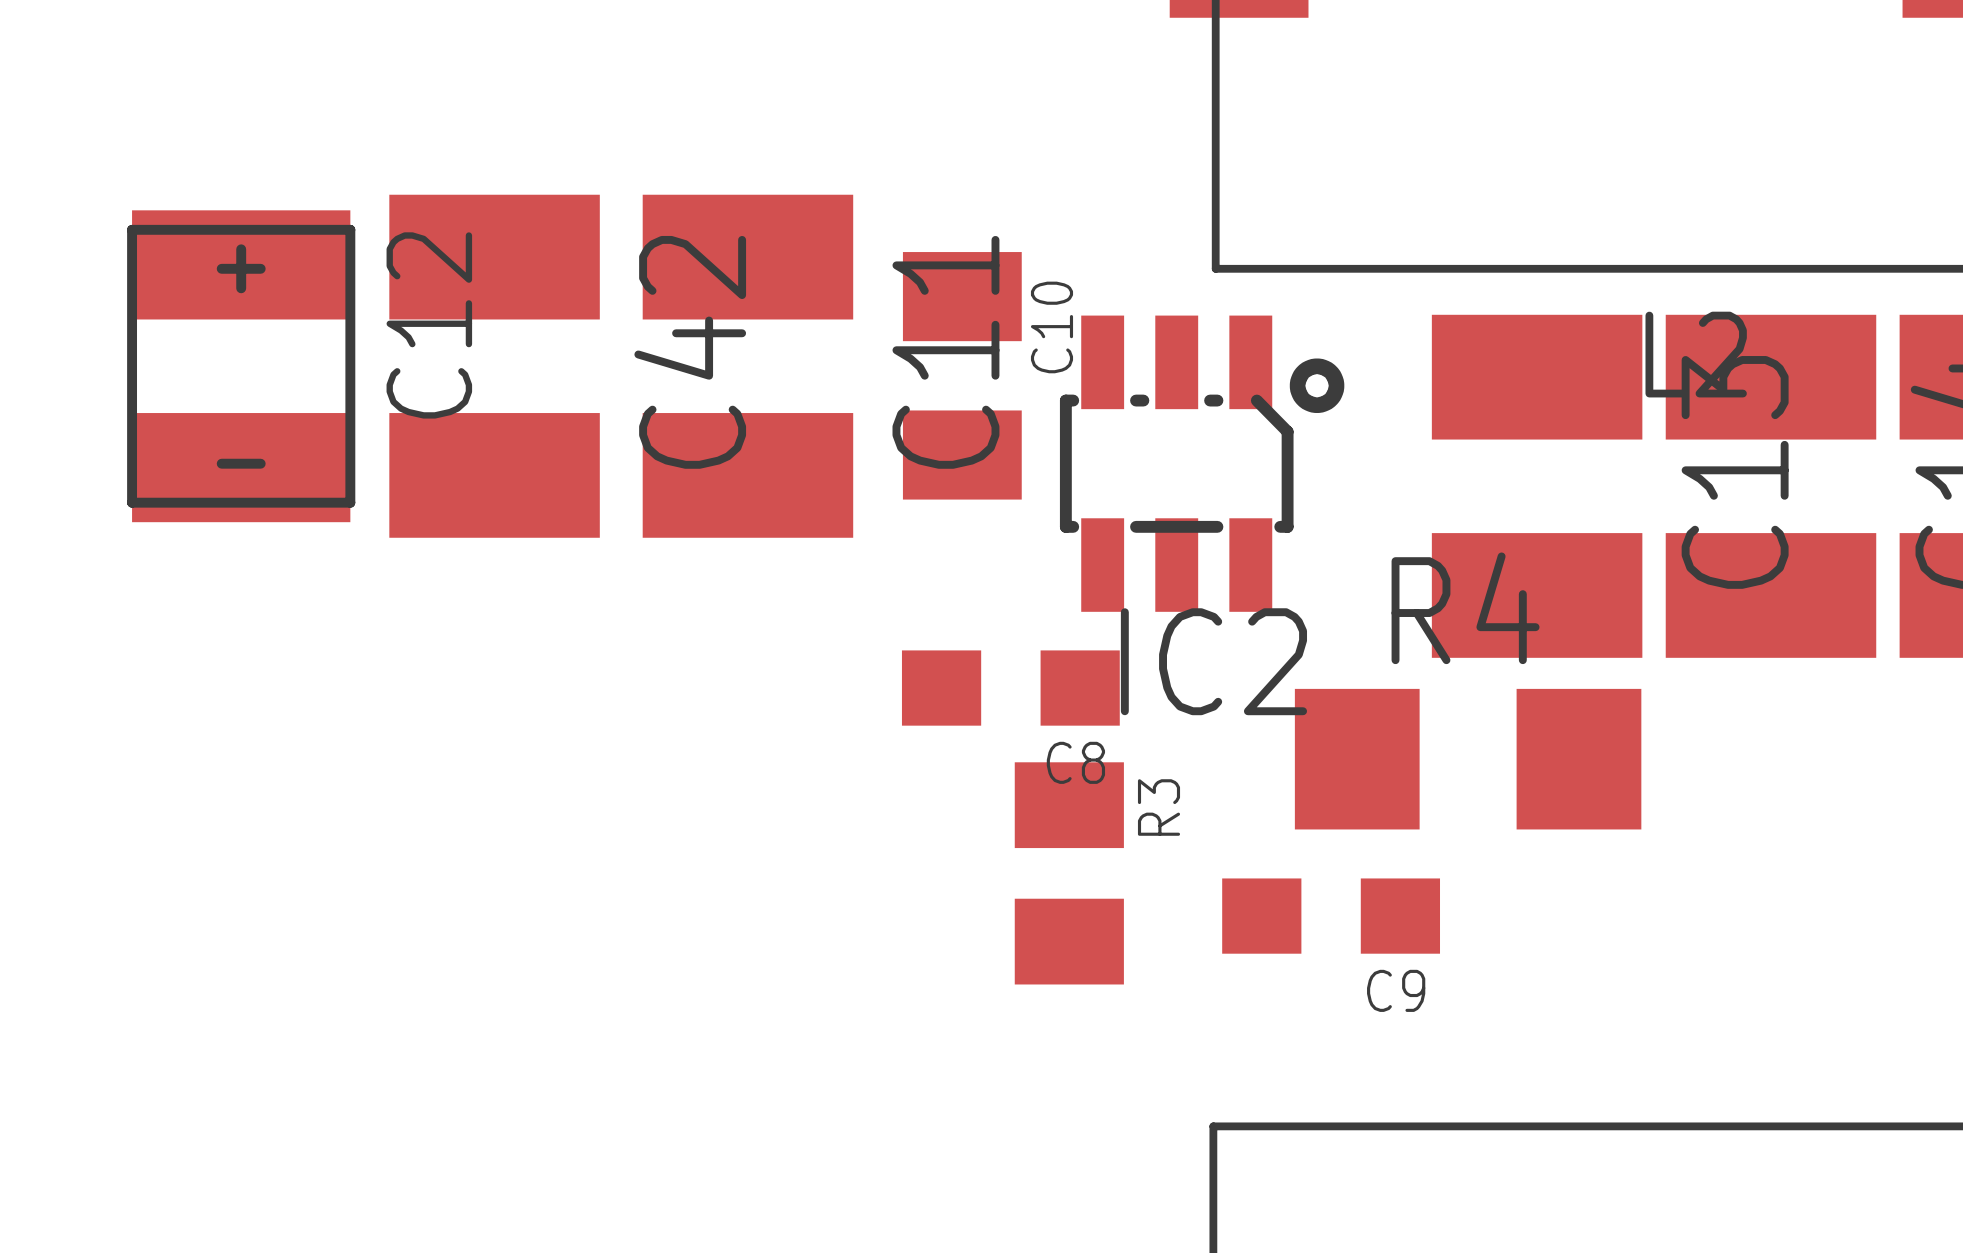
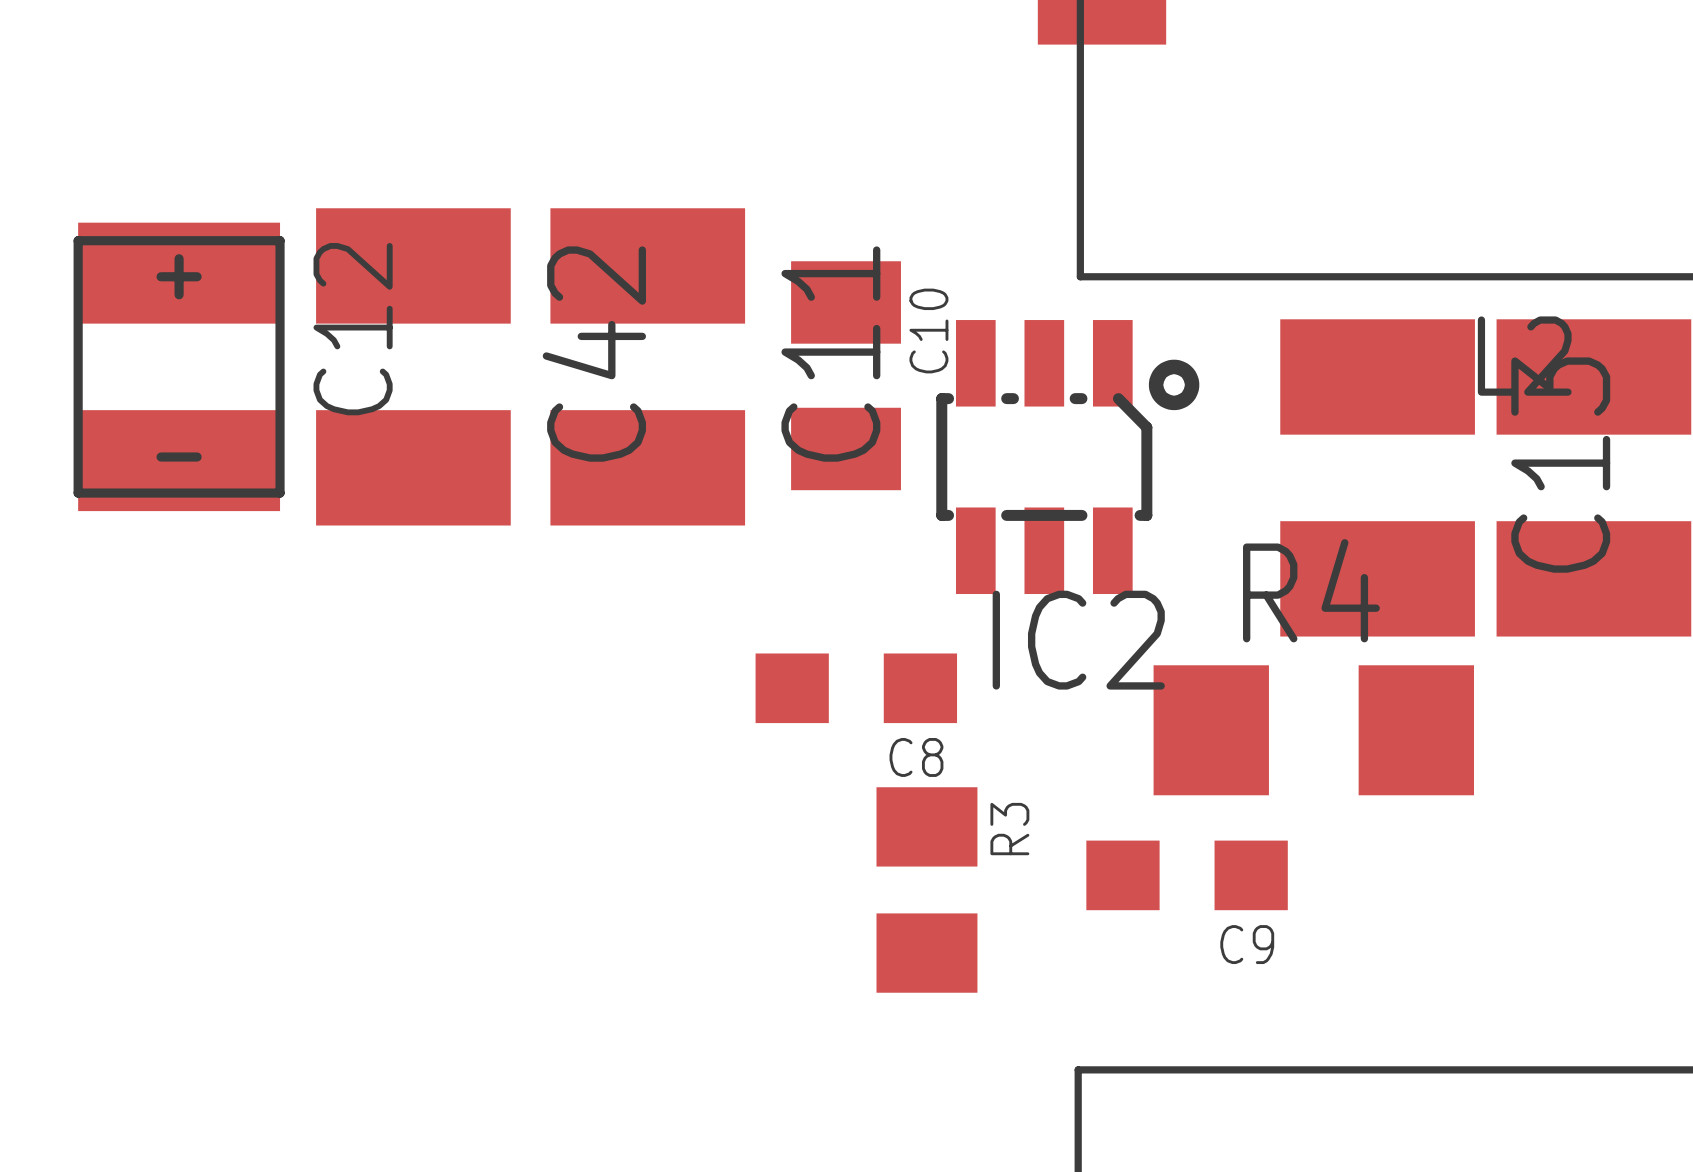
C8 position: (1010, 688) -> (856, 688)
R3 position: (1069, 873) -> (926, 889)

